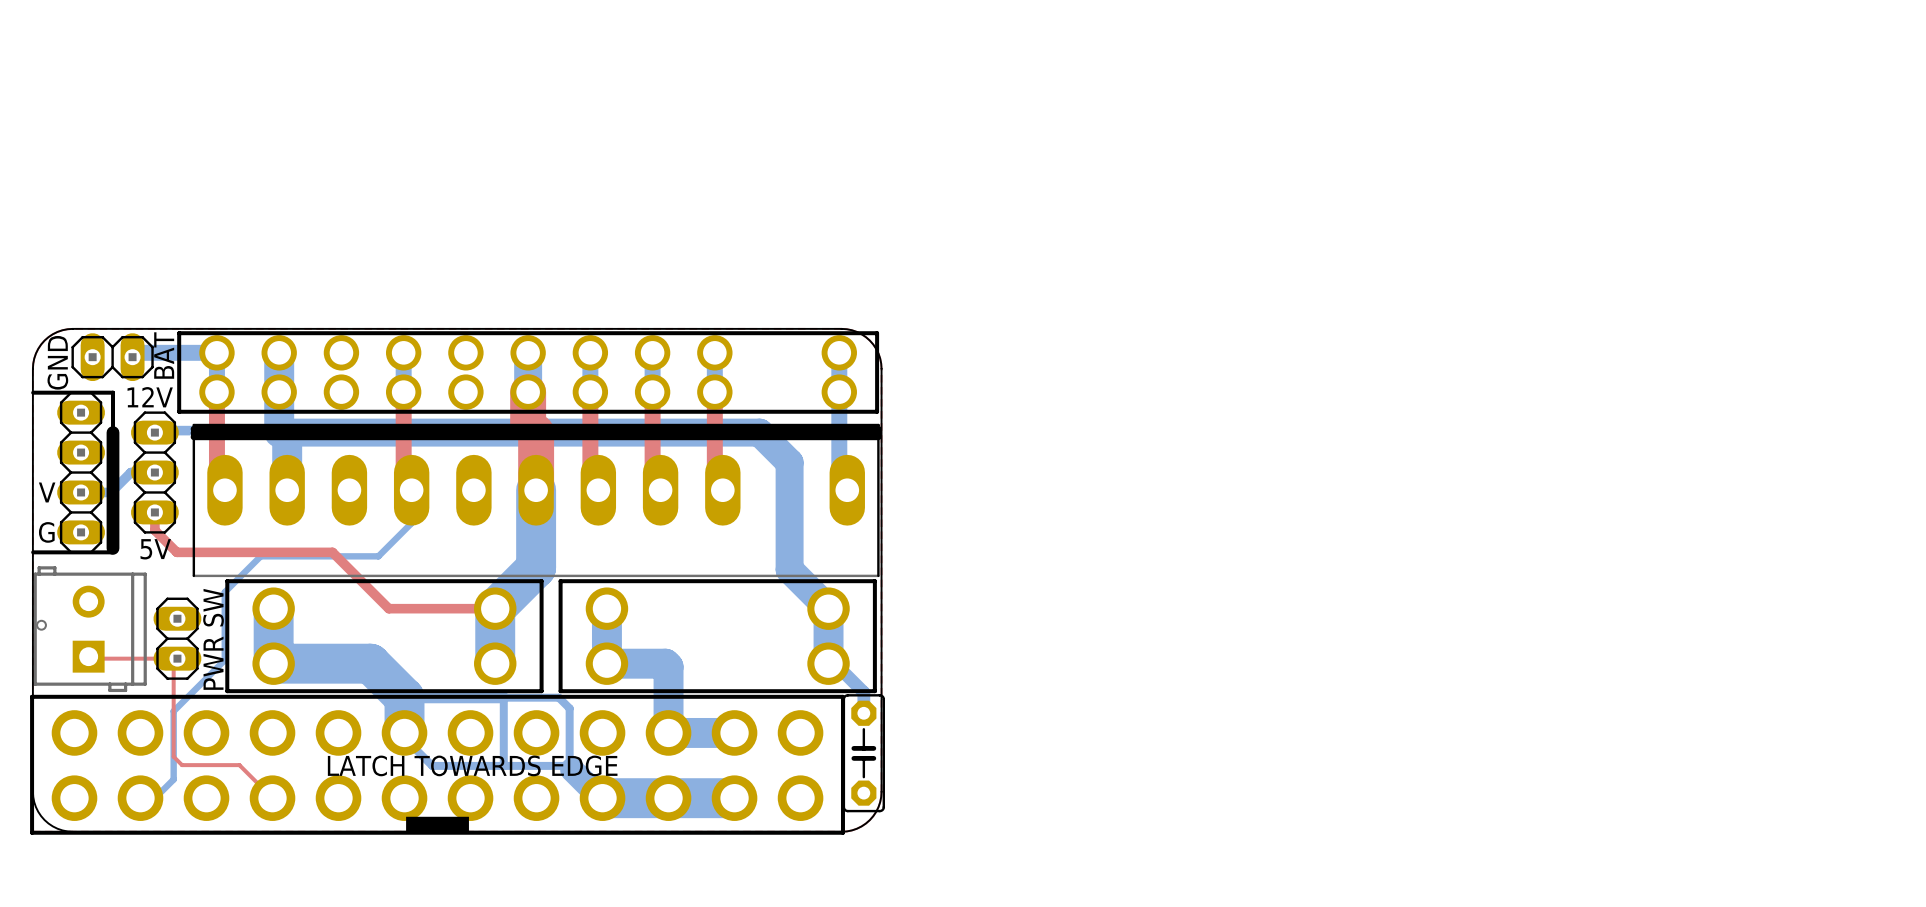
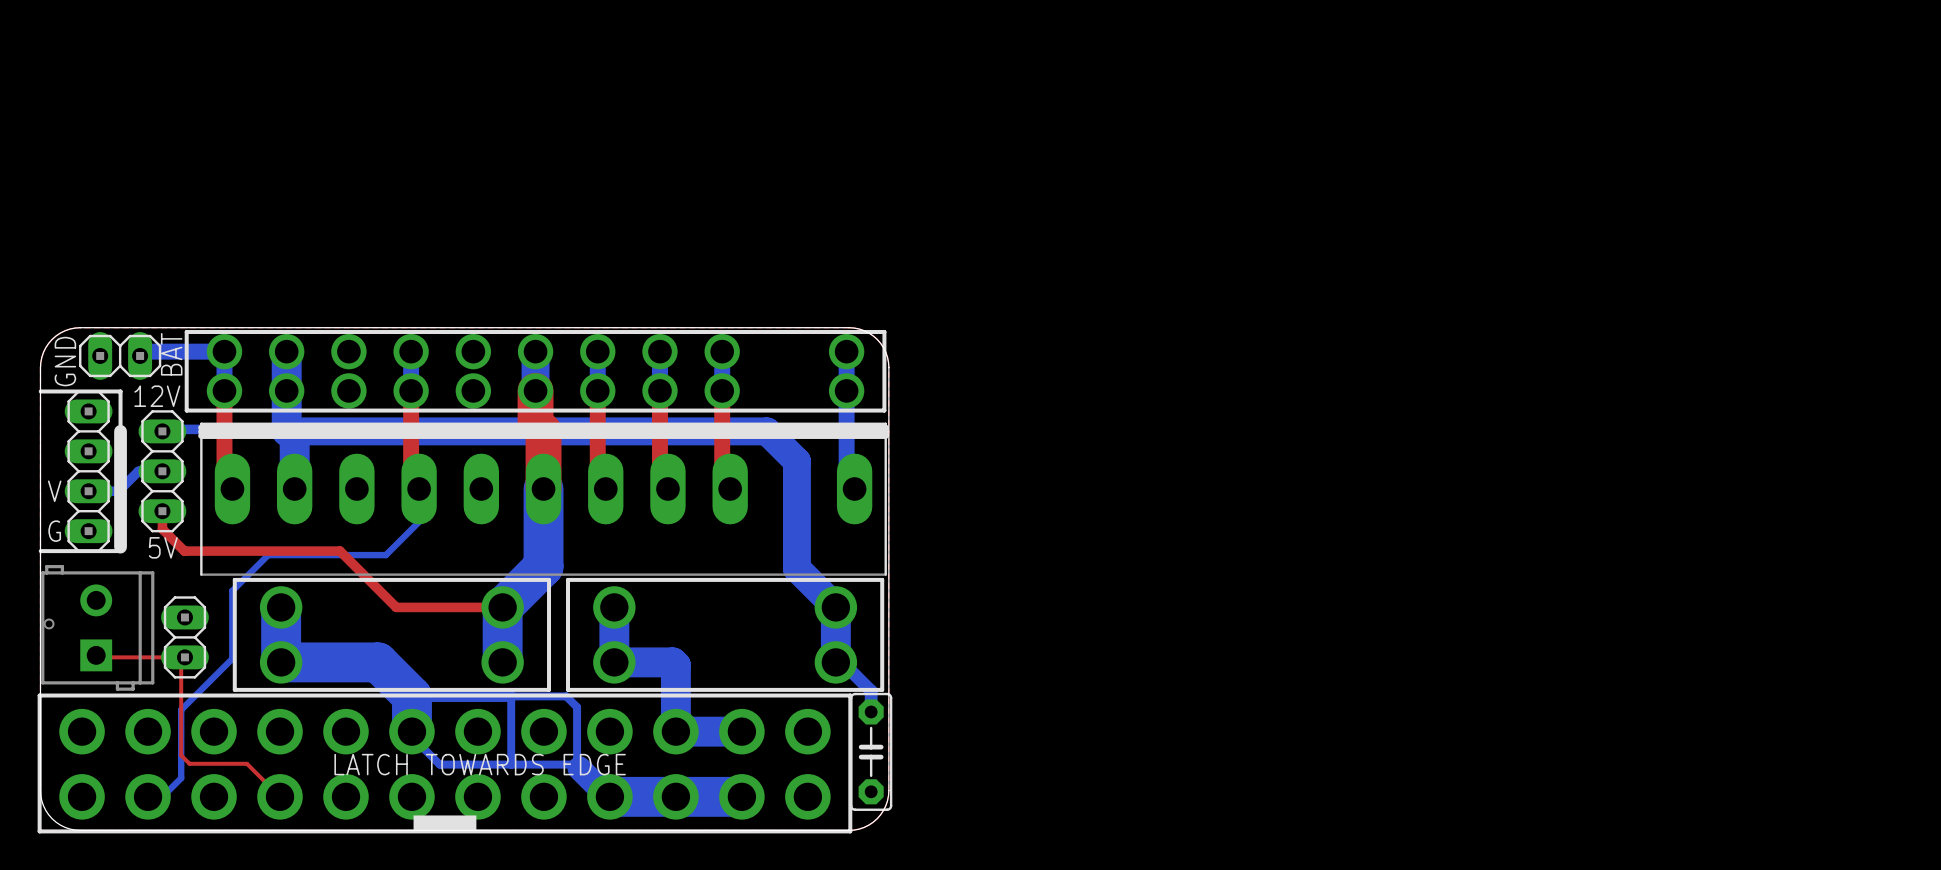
text: PWR SW (213, 639) -> none

